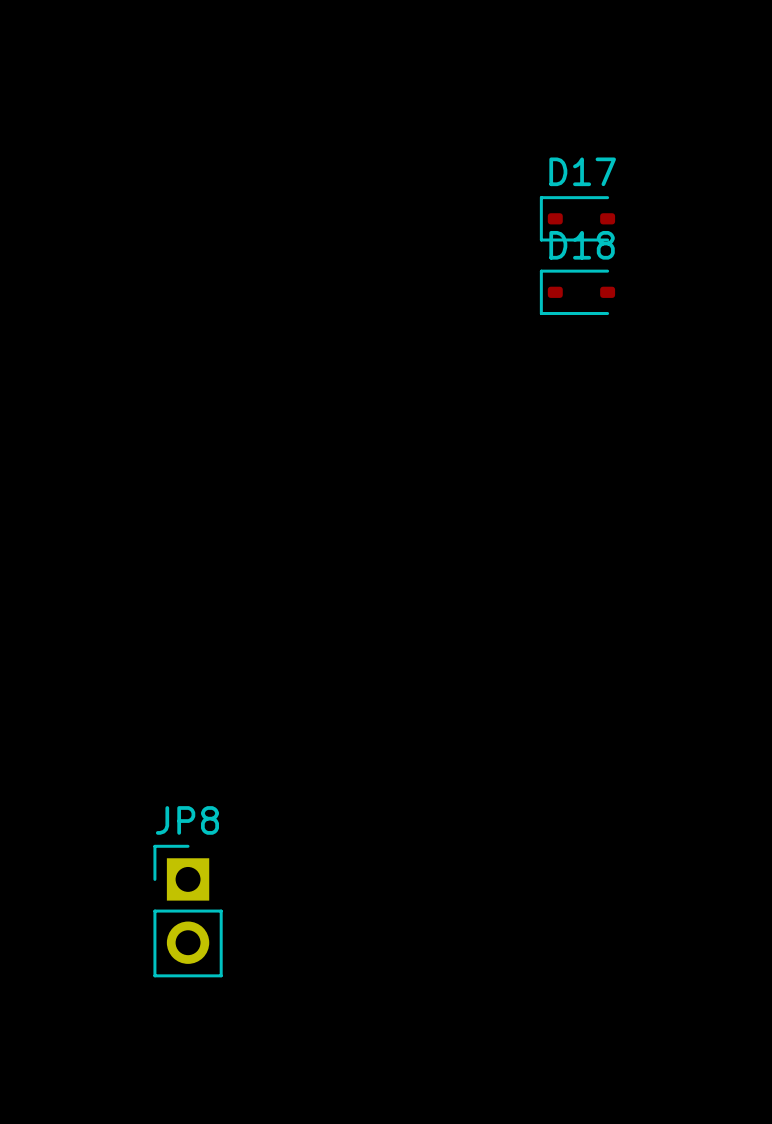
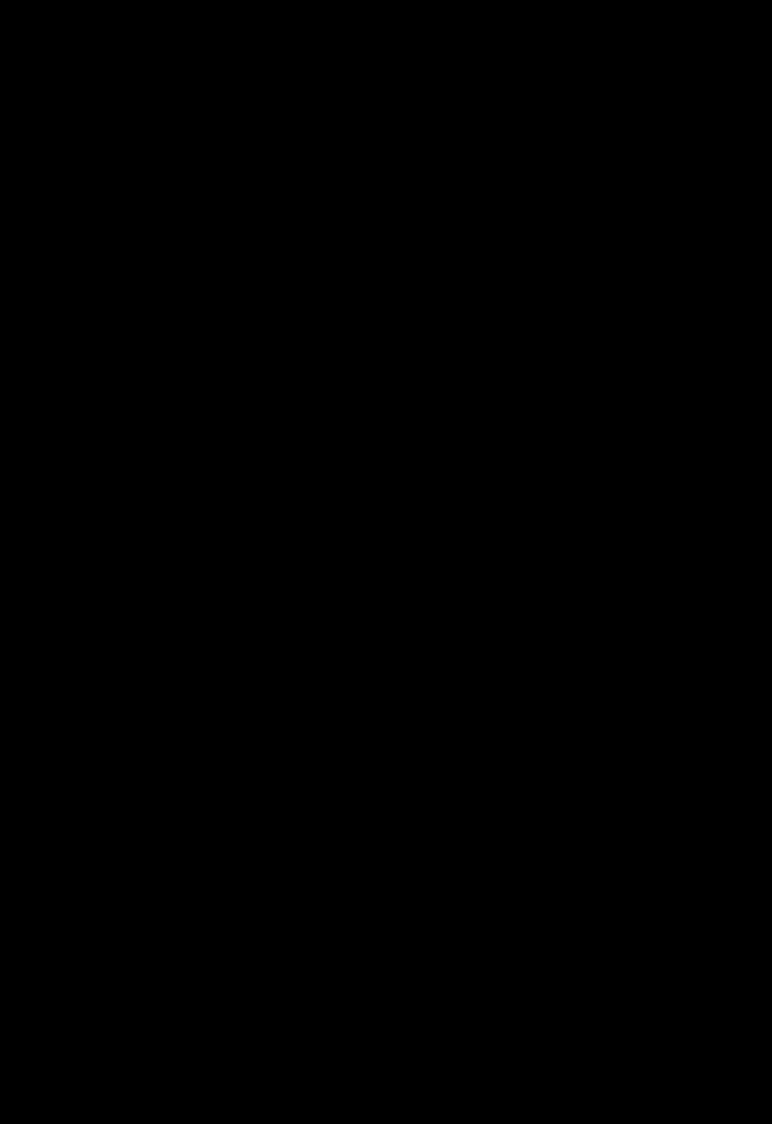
D17: (577, 218) -> none
D18: (577, 292) -> none
JP8: (188, 911) -> none

